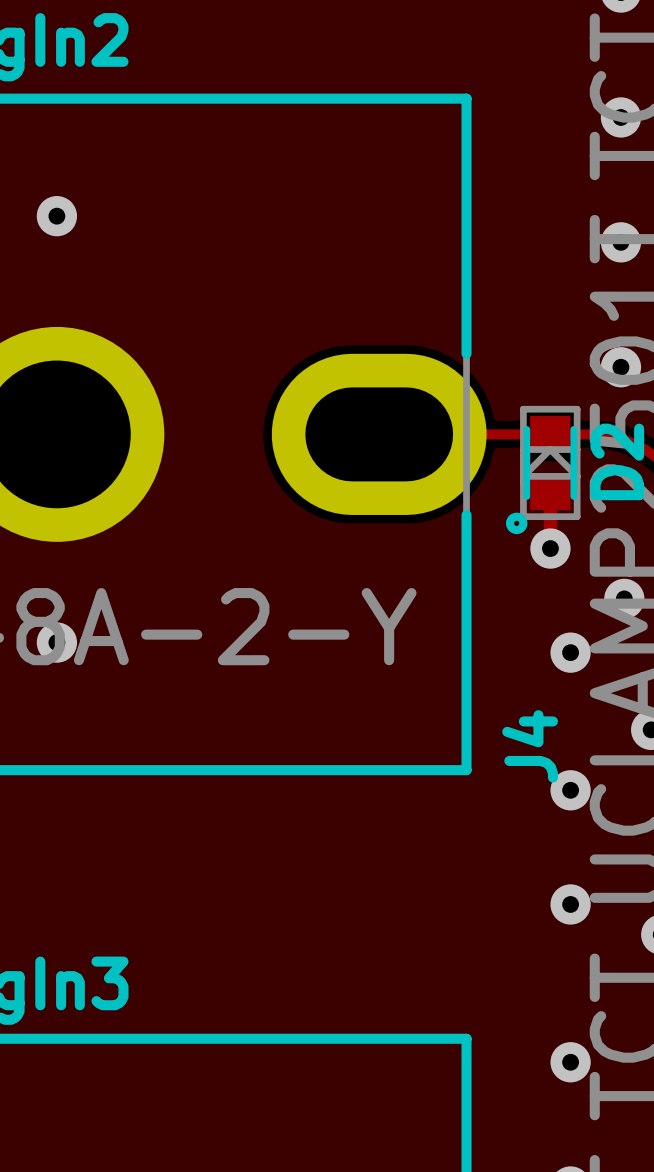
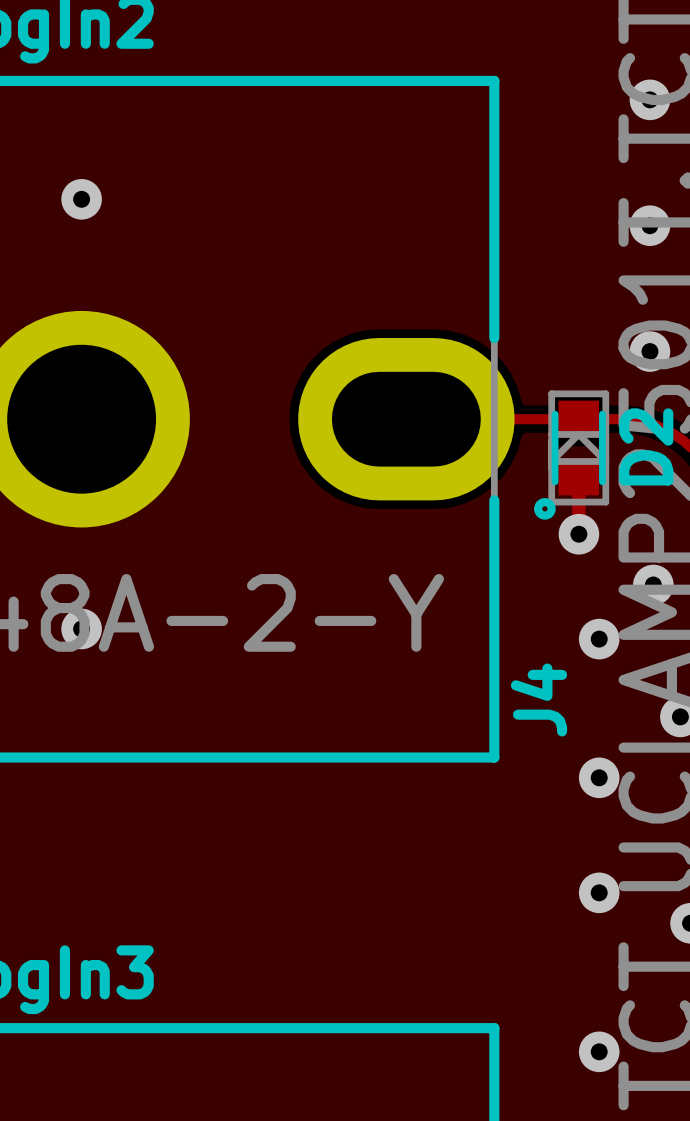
J4 name position: J4 (530, 746) -> J4 (539, 700)

